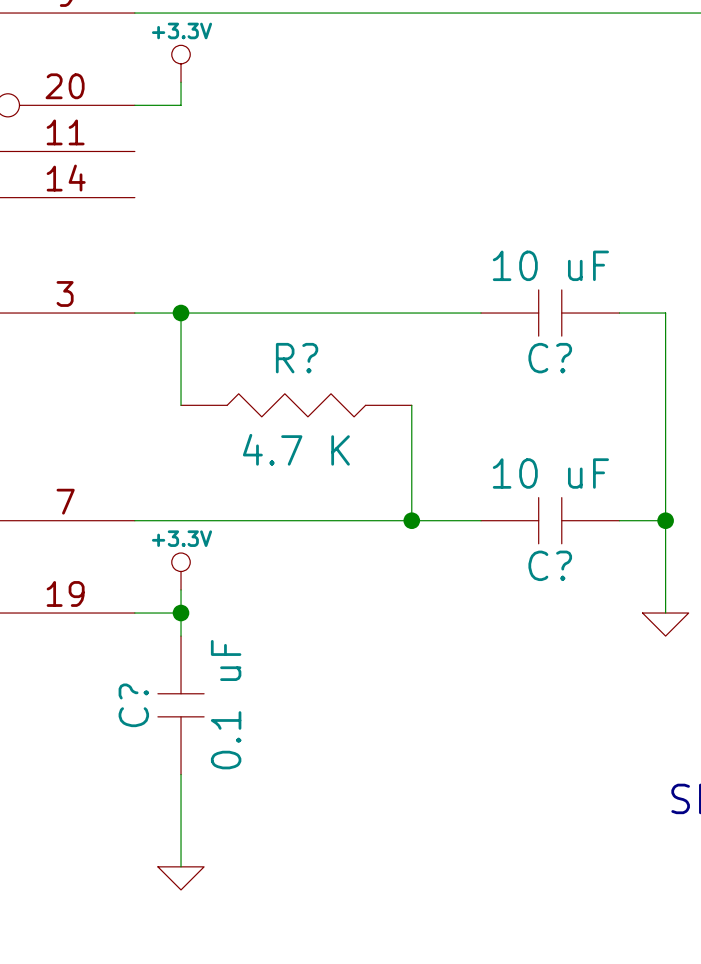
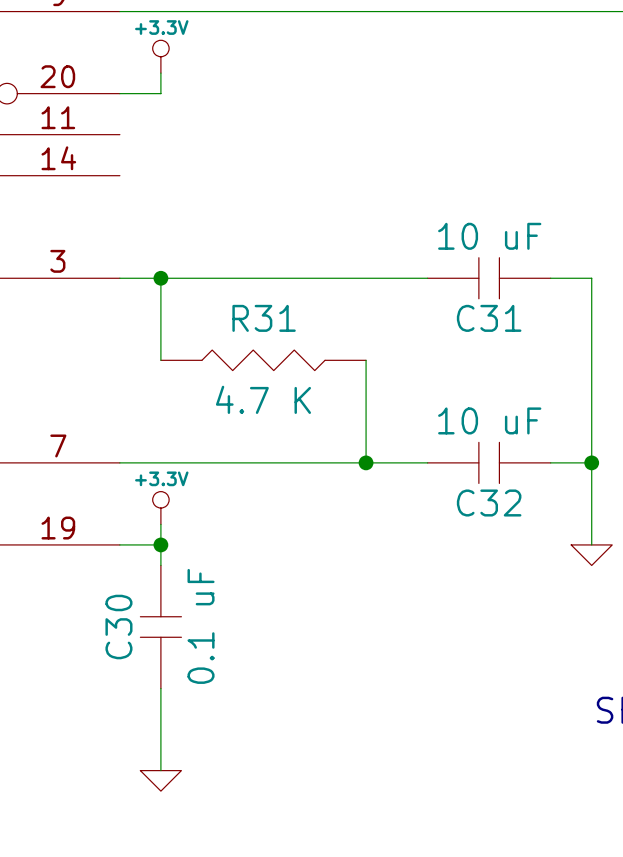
R? name: R? (297, 358) -> R31 (264, 318)
C? name: C? (550, 358) -> C31 (489, 318)
C? name: C? (550, 565) -> C32 (489, 503)
C? name: C? (133, 705) -> C30 (118, 627)

